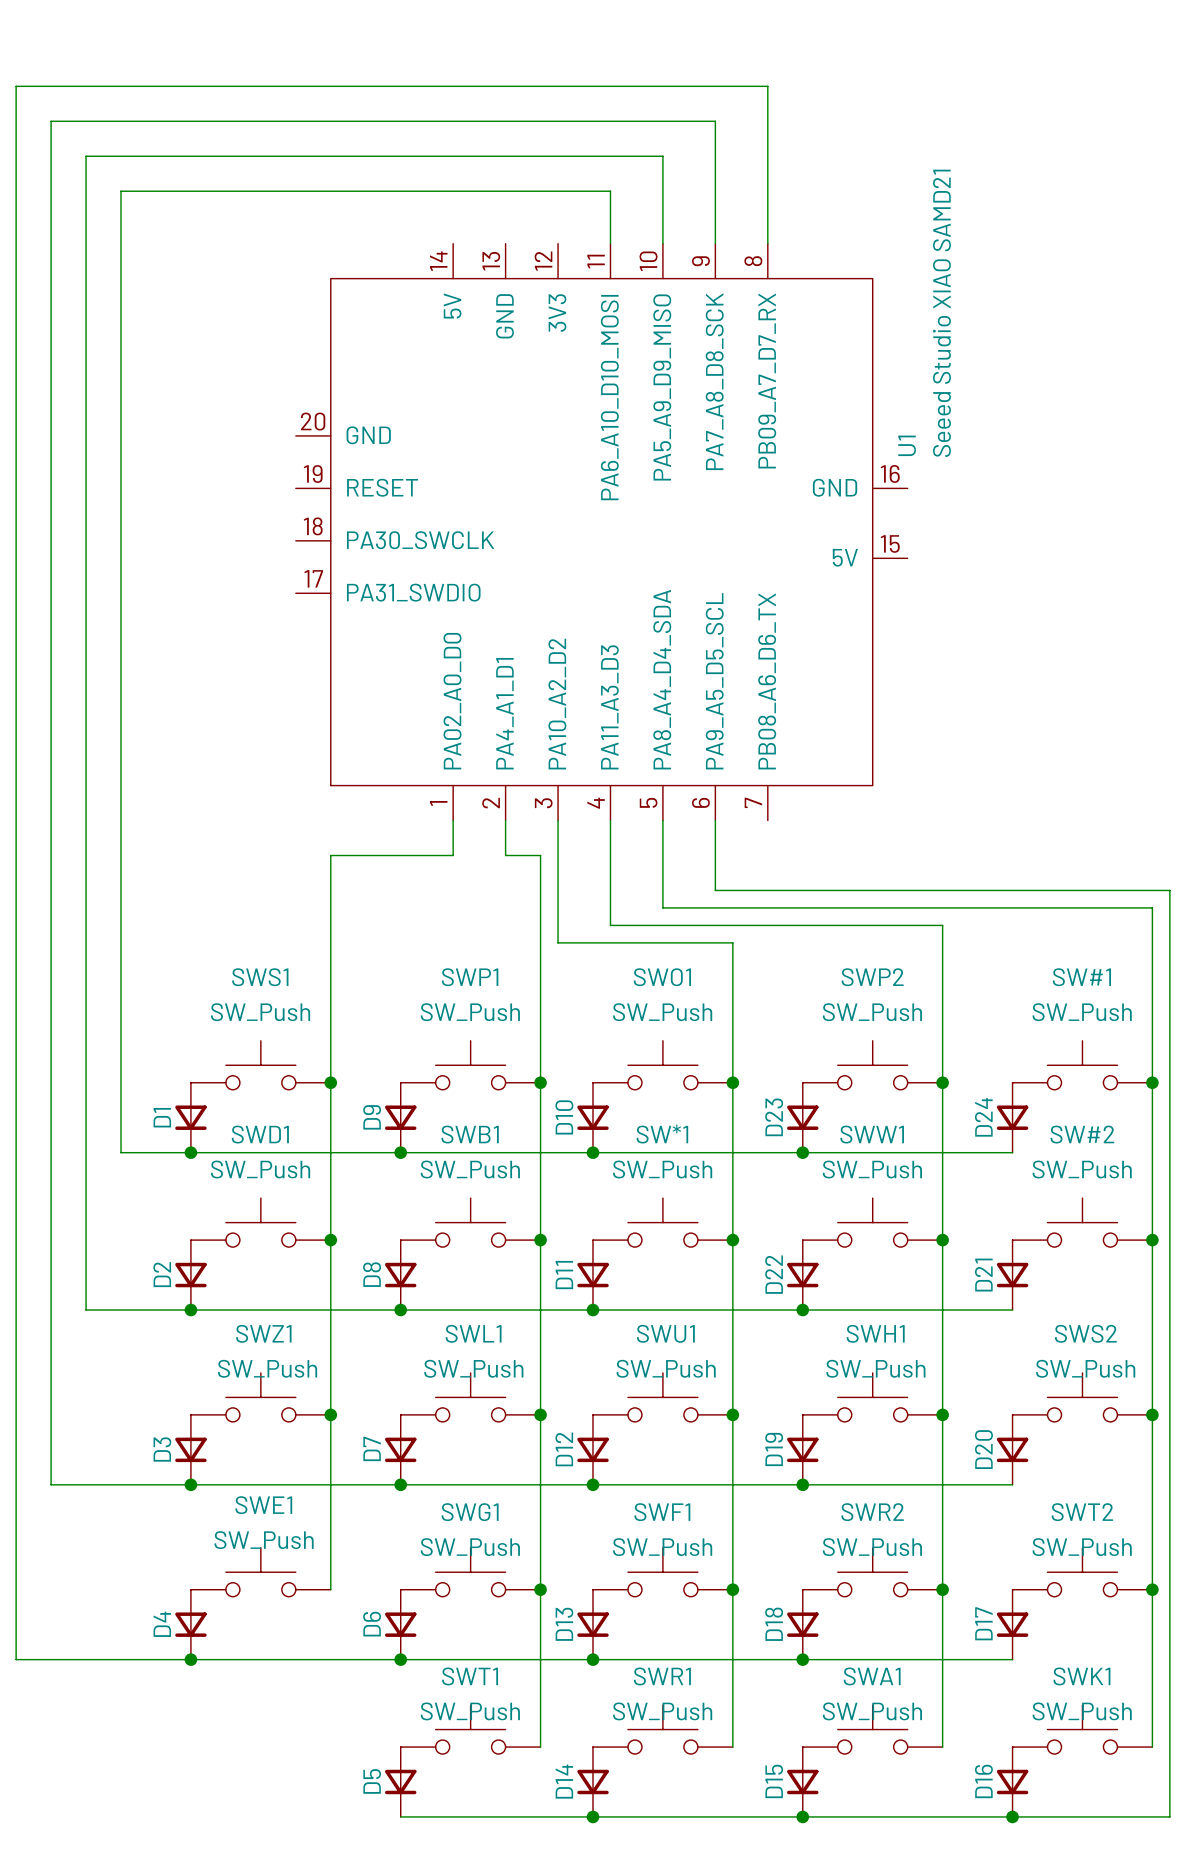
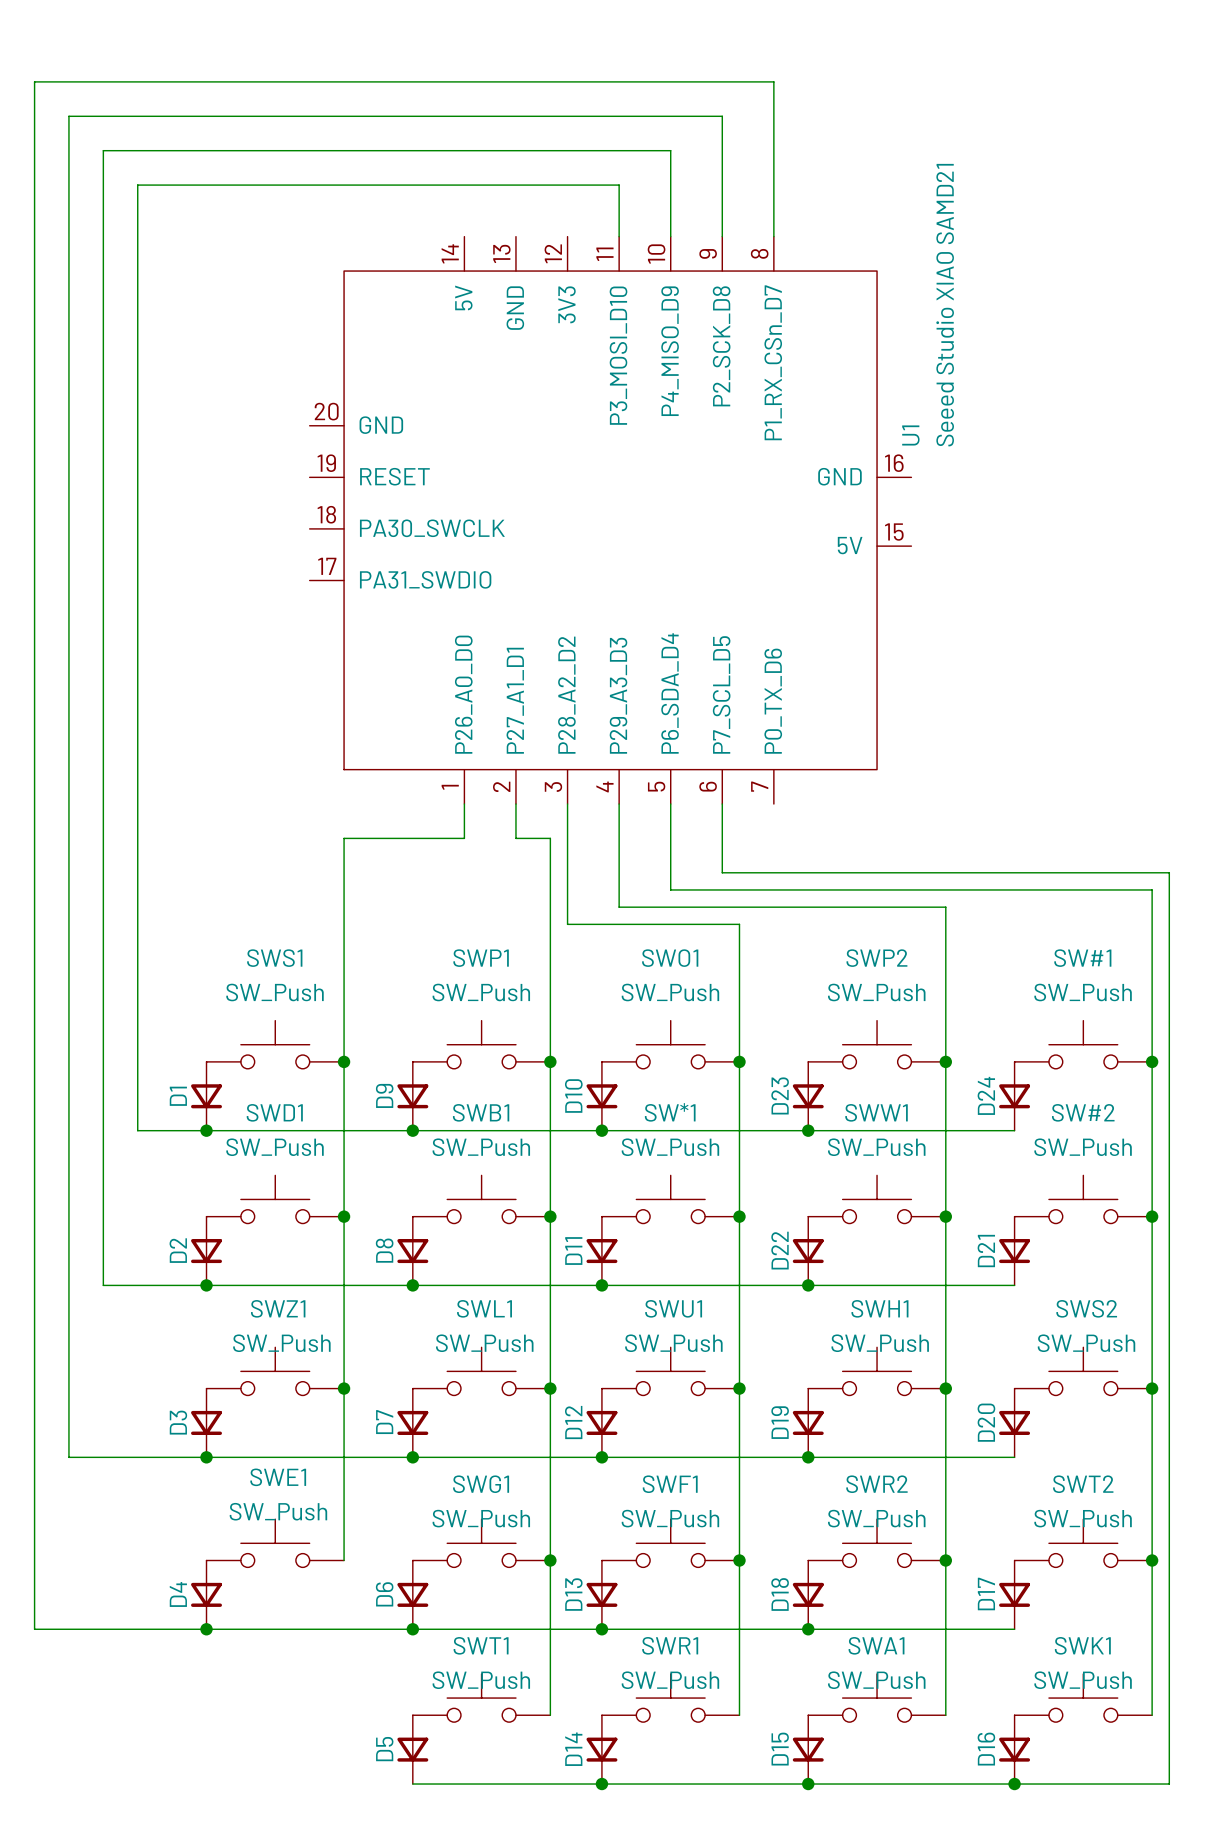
U1 symbol: [295, 243, 908, 821] -> [309, 236, 912, 805]

